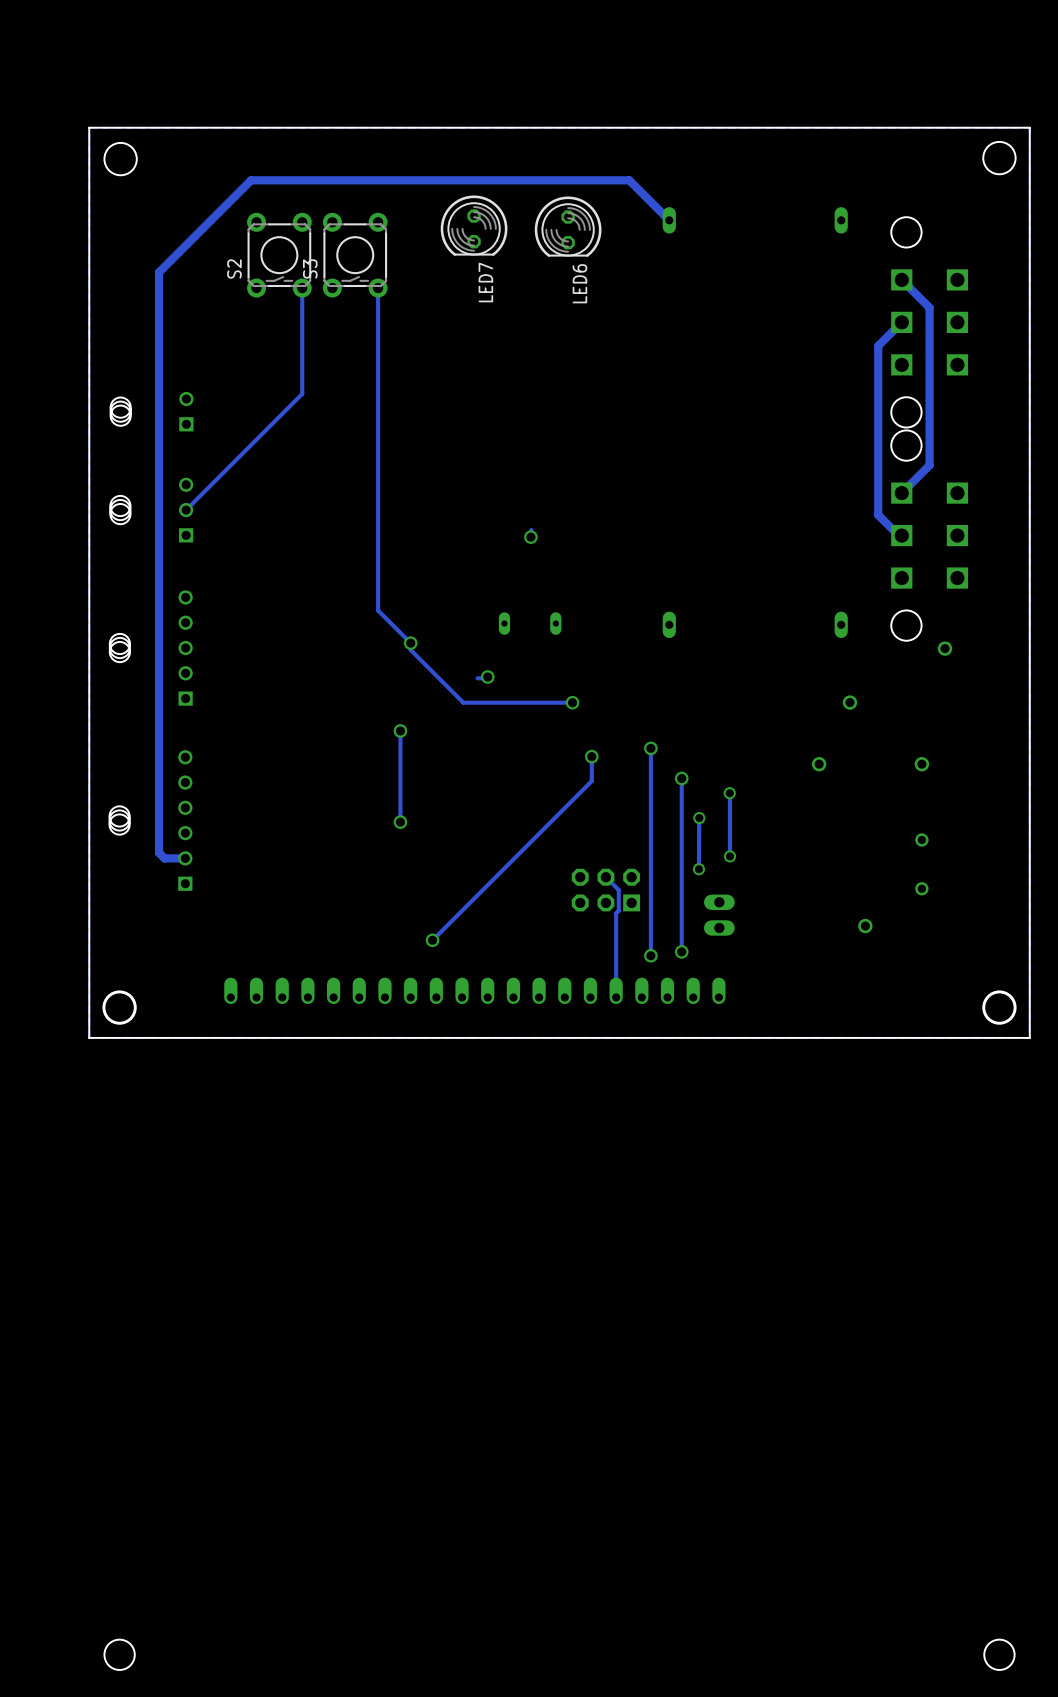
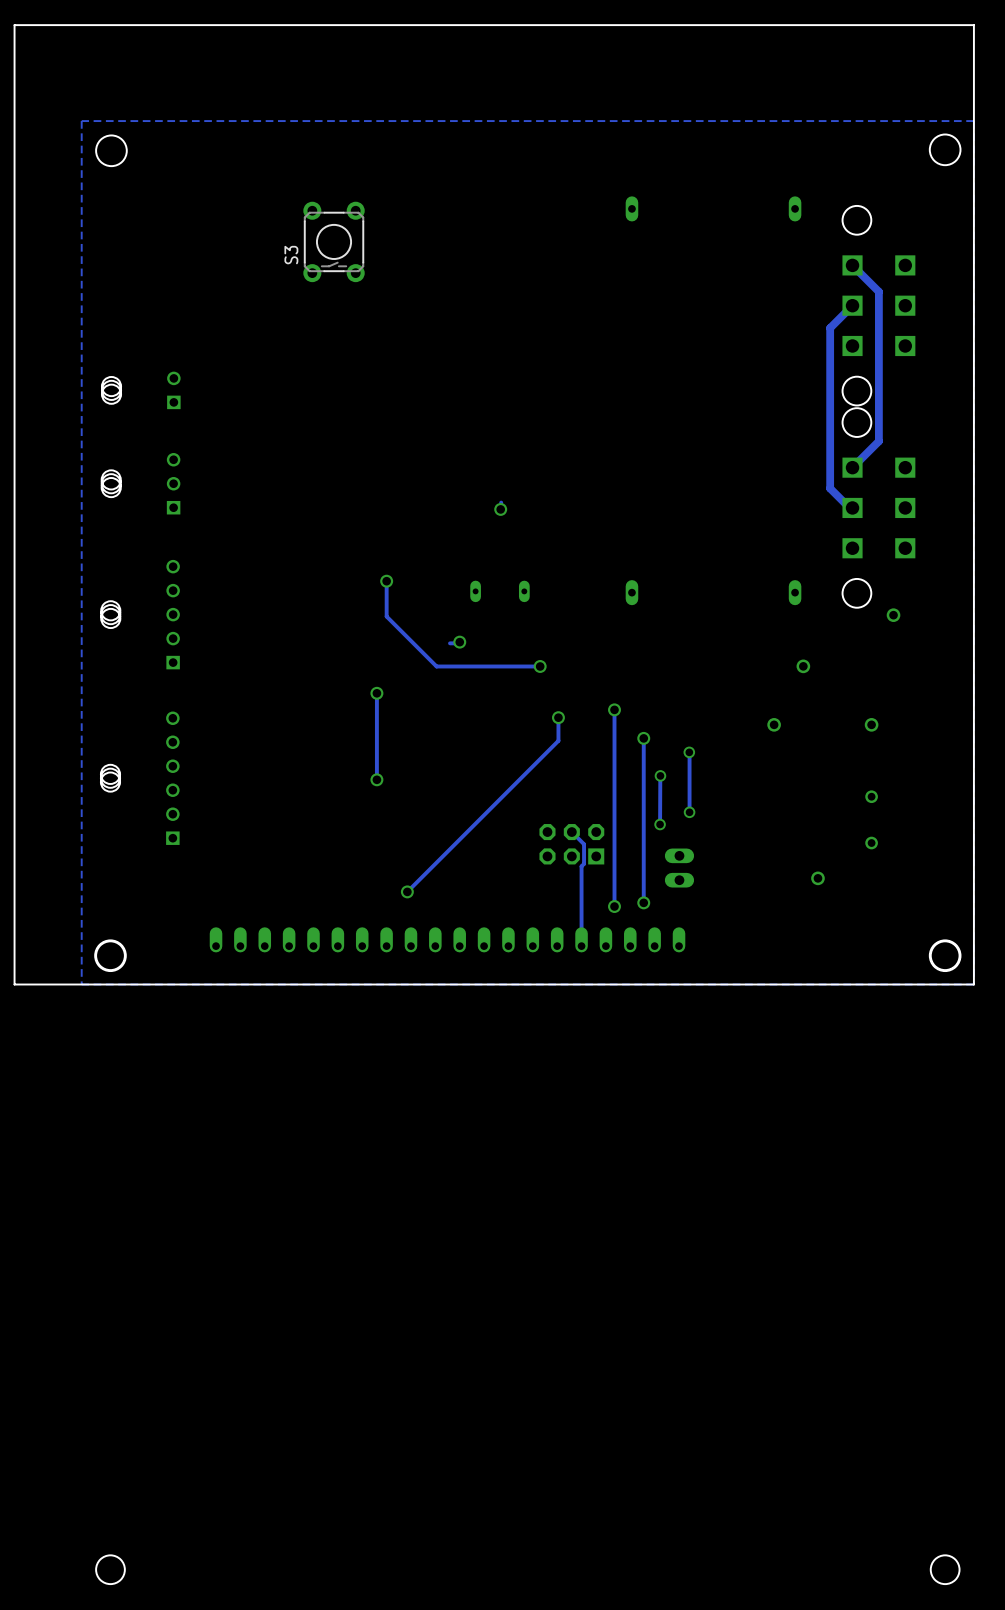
board edge: (1029, 127) (89, 127) (89, 1037) -> (973, 121) (973, 25) (14, 25) (14, 984) (81, 984)
track: (669, 220) (629, 180) (251, 180) (159, 272) (159, 852) (164, 858) (185, 858) -> none
LED7: (474, 225) -> none
LED6: (568, 226) -> none
S2: (279, 255) -> none
track: (302, 288) (302, 393) (186, 510) -> none
track: (378, 288) (378, 610) (410, 643) -> (386, 581) (386, 609)
via position: (410, 643) -> (386, 581)

